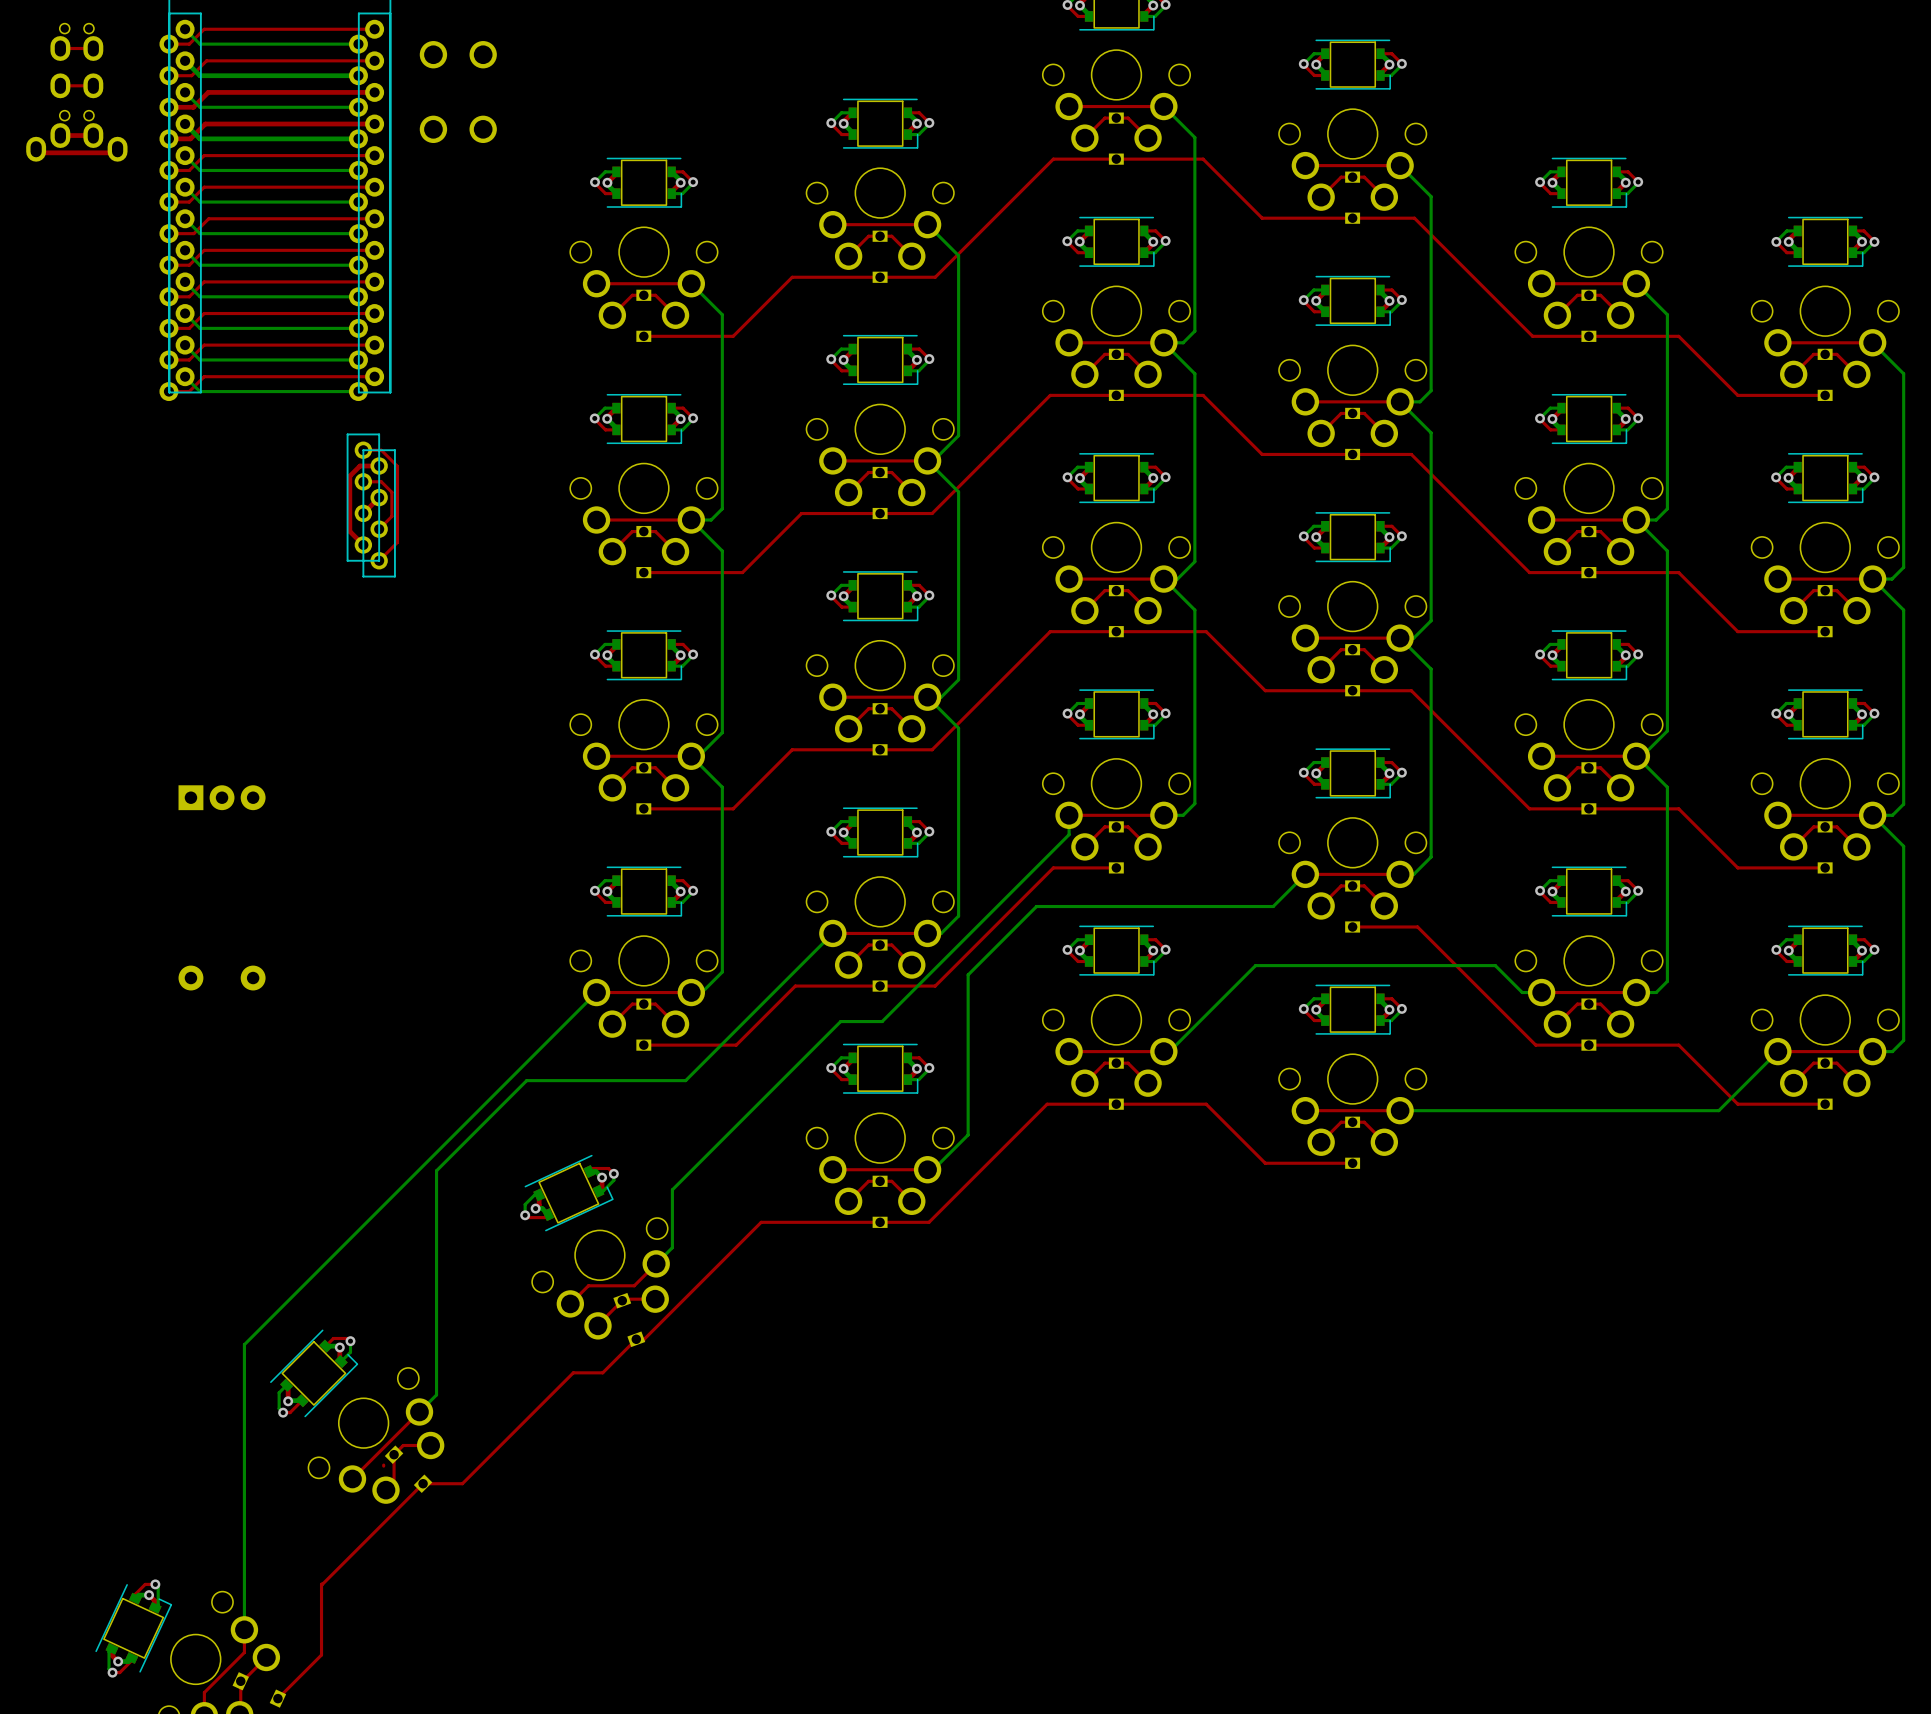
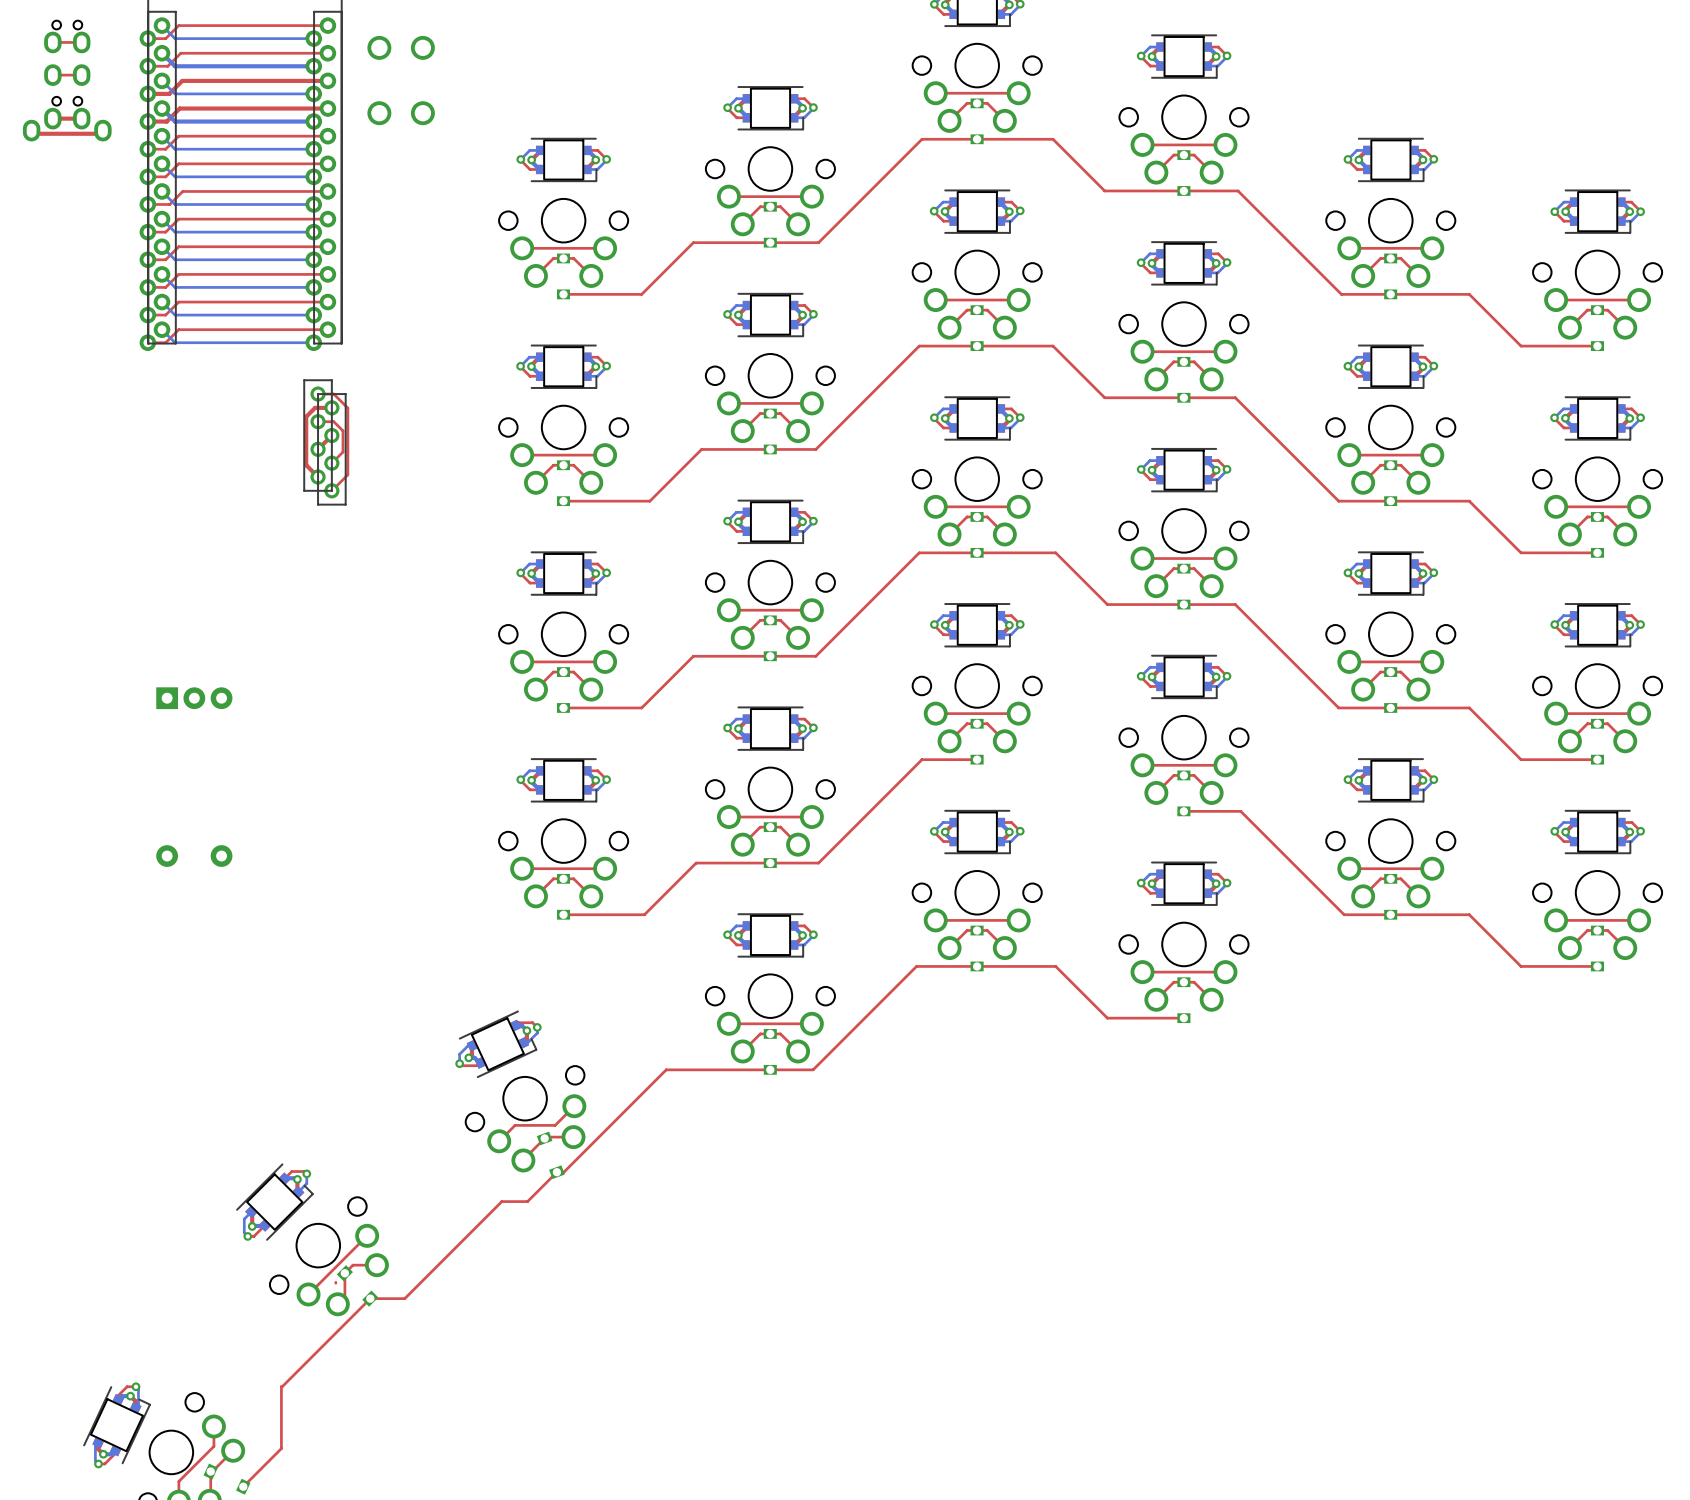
bottom track: (1163, 106) (1194, 137) (1194, 331) (1183, 342) (1163, 342) (1194, 373) (1194, 561) (1177, 579) (1163, 579) (1194, 610) (1194, 803) (1183, 815) (1163, 815) -> none
bottom track: (1400, 165) (1431, 196) (1431, 390) (1419, 401) (1400, 401) (1431, 432) (1431, 620) (1413, 638) (1400, 638) (1431, 669) (1431, 857) (1413, 874) (1400, 874) -> none
bottom track: (927, 224) (958, 255) (958, 435) (933, 460) (927, 460) (958, 491) (958, 679) (941, 697) (927, 697) (958, 728) (958, 916) (941, 933) (927, 933) -> none
bottom track: (691, 283) (722, 314) (722, 508) (711, 519) (691, 519) (722, 551) (722, 732) (698, 756) (691, 756) (722, 787) (722, 972) (701, 992) (691, 992) -> none
bottom track: (1636, 283) (1667, 314) (1667, 508) (1656, 519) (1636, 519) (1667, 551) (1667, 730) (1642, 756) (1636, 756) (1667, 787) (1667, 981) (1656, 992) (1636, 992) -> none
bottom track: (1872, 342) (1903, 373) (1903, 567) (1892, 579) (1872, 579) (1903, 610) (1903, 804) (1892, 815) (1872, 815) (1903, 846) (1903, 1040) (1892, 1051) (1872, 1051) -> none
bottom track: (1069, 815) (1069, 834) (882, 1021) (840, 1021) (672, 1189) (672, 1247) (656, 1263) -> none
bottom track: (1305, 874) (1273, 906) (1036, 906) (968, 974) (968, 1134) (933, 1169) (927, 1169) -> none
bottom track: (832, 933) (685, 1080) (526, 1080) (436, 1170) (436, 1394) (419, 1411) -> none
bottom track: (596, 992) (244, 1344) (244, 1629) -> none
bottom track: (1541, 992) (1522, 992) (1495, 965) (1255, 965) (1169, 1051) (1163, 1051) -> none
bottom track: (1777, 1051) (1718, 1110) (1400, 1110) -> none

